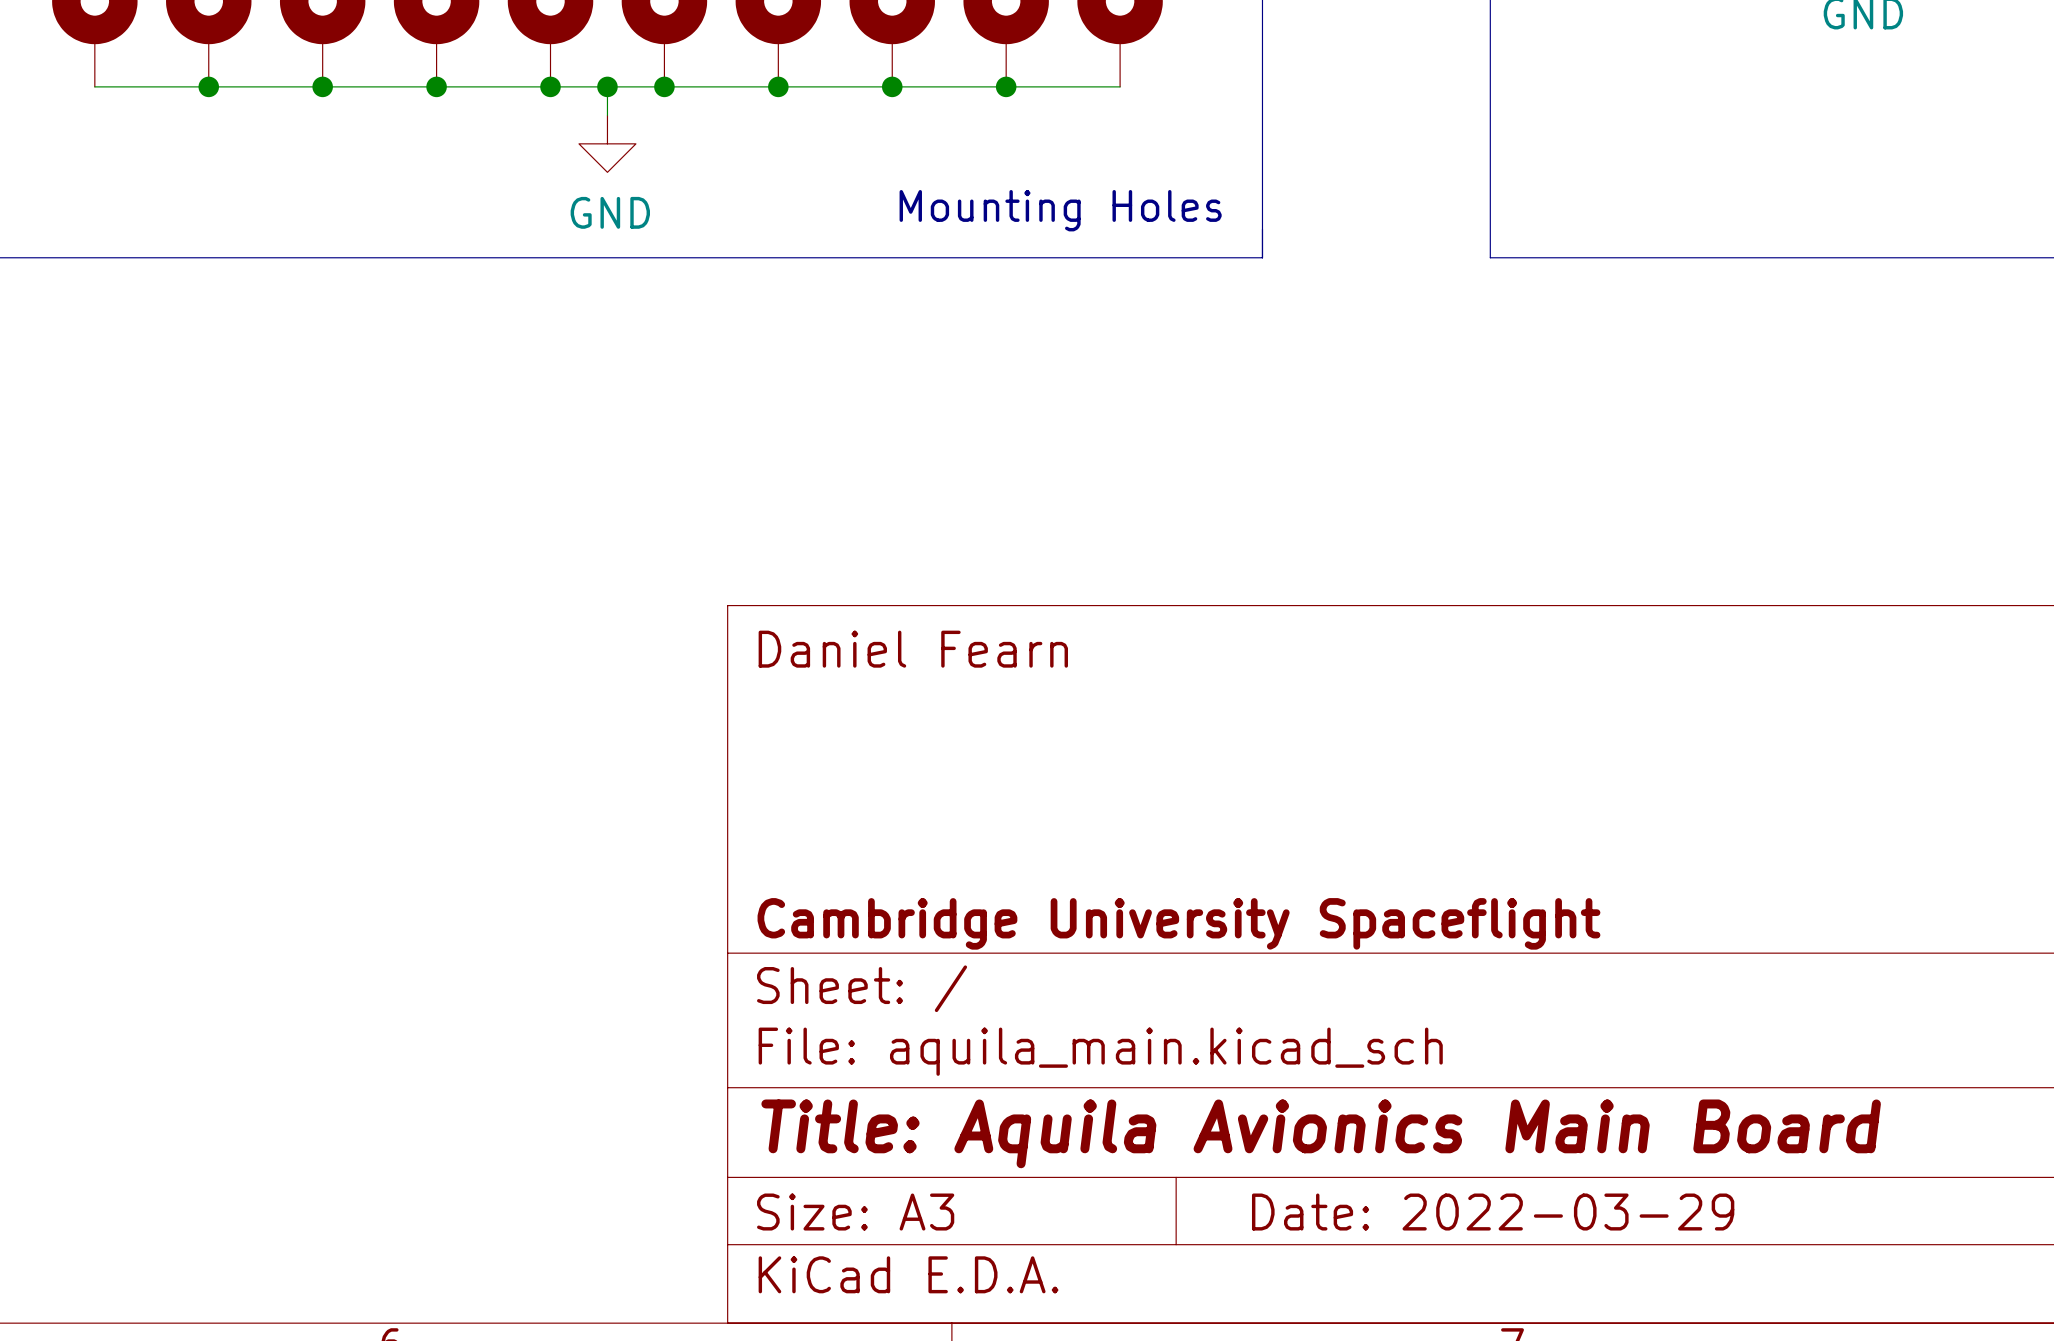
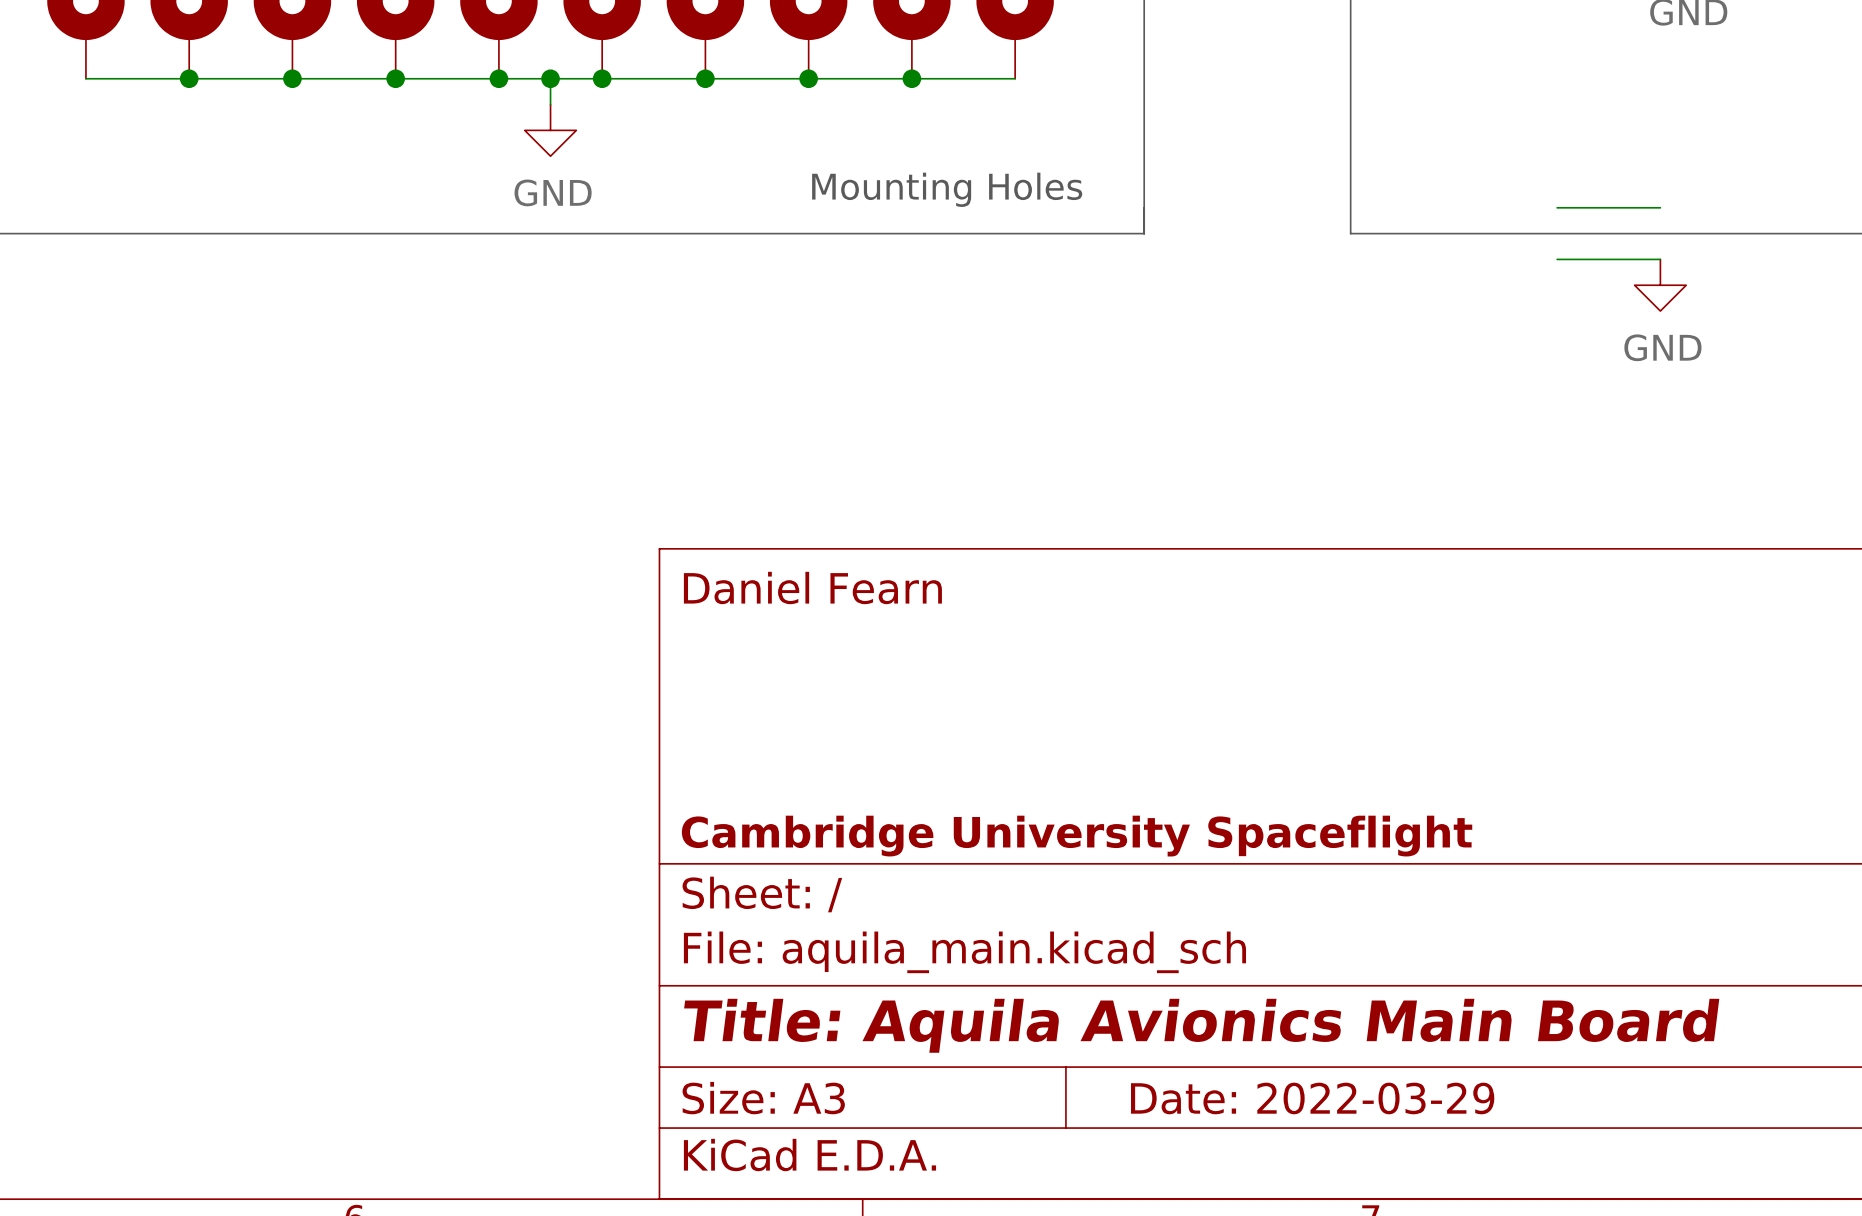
wire: none -> (1557, 207) (1660, 207)
wire: none -> (1557, 259) (1660, 259)
power symbol: none -> GND (1660, 285)

